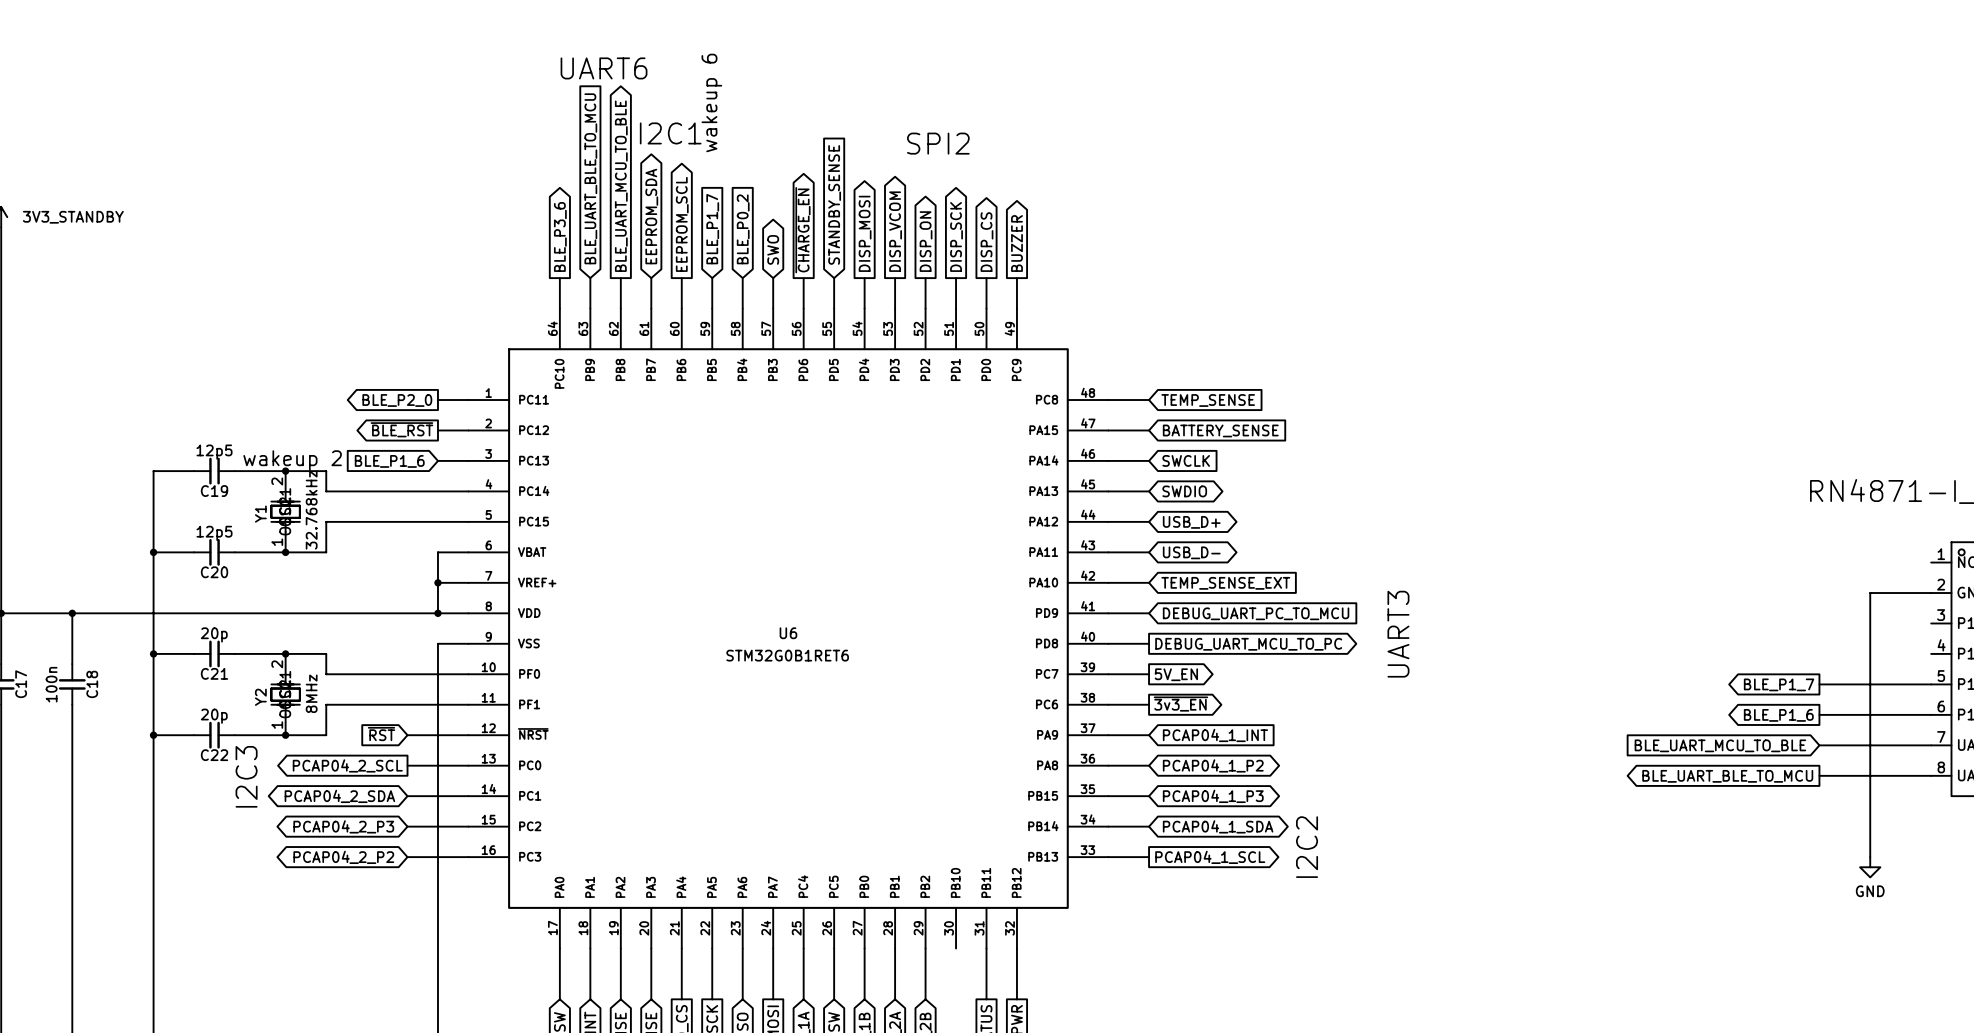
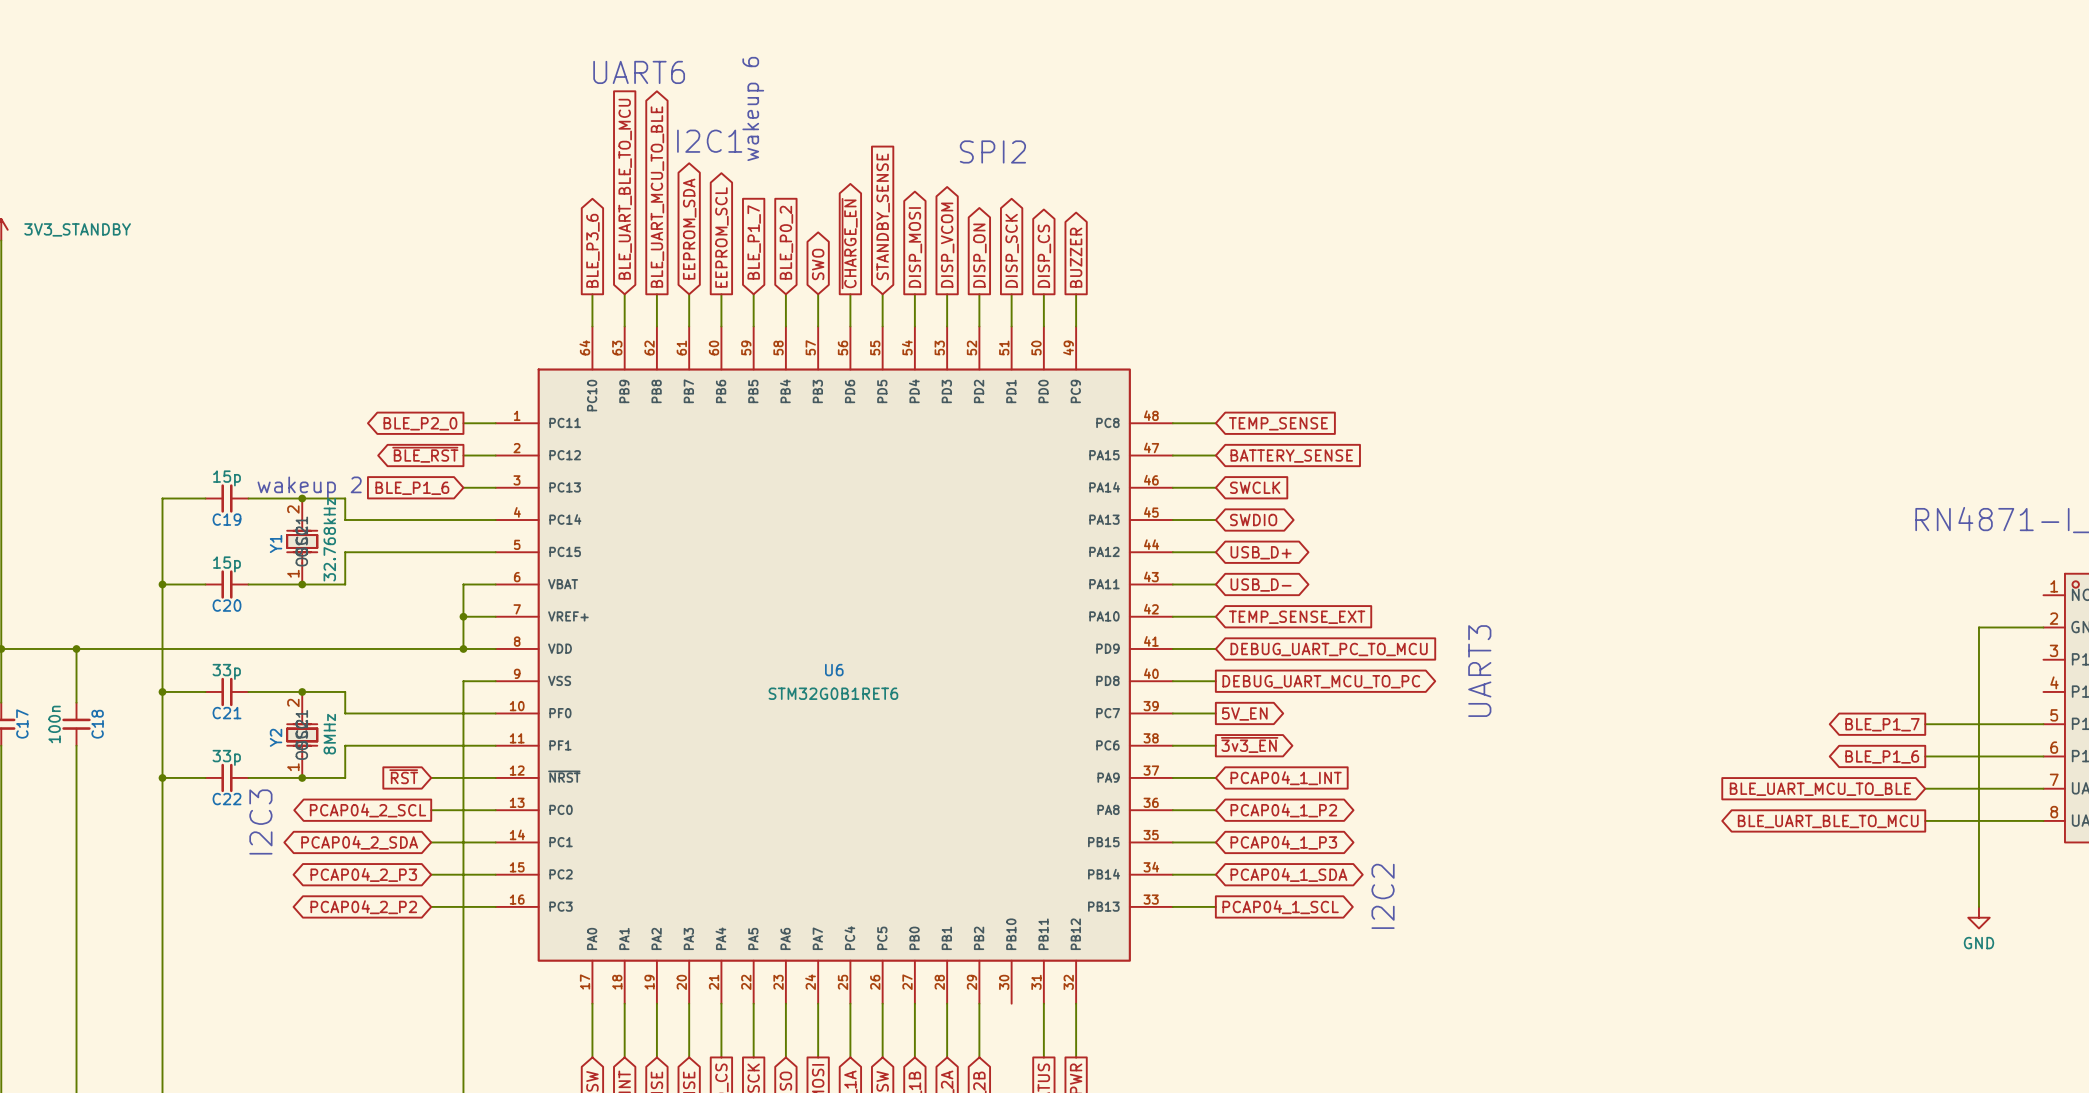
C19 value: 12p5 (214, 452) -> 15p (226, 478)
C20 value: 12p5 (214, 533) -> 15p (226, 564)
C21 value: 20p (214, 634) -> 33p (226, 671)
C22 value: 20p (214, 716) -> 33p (226, 757)

